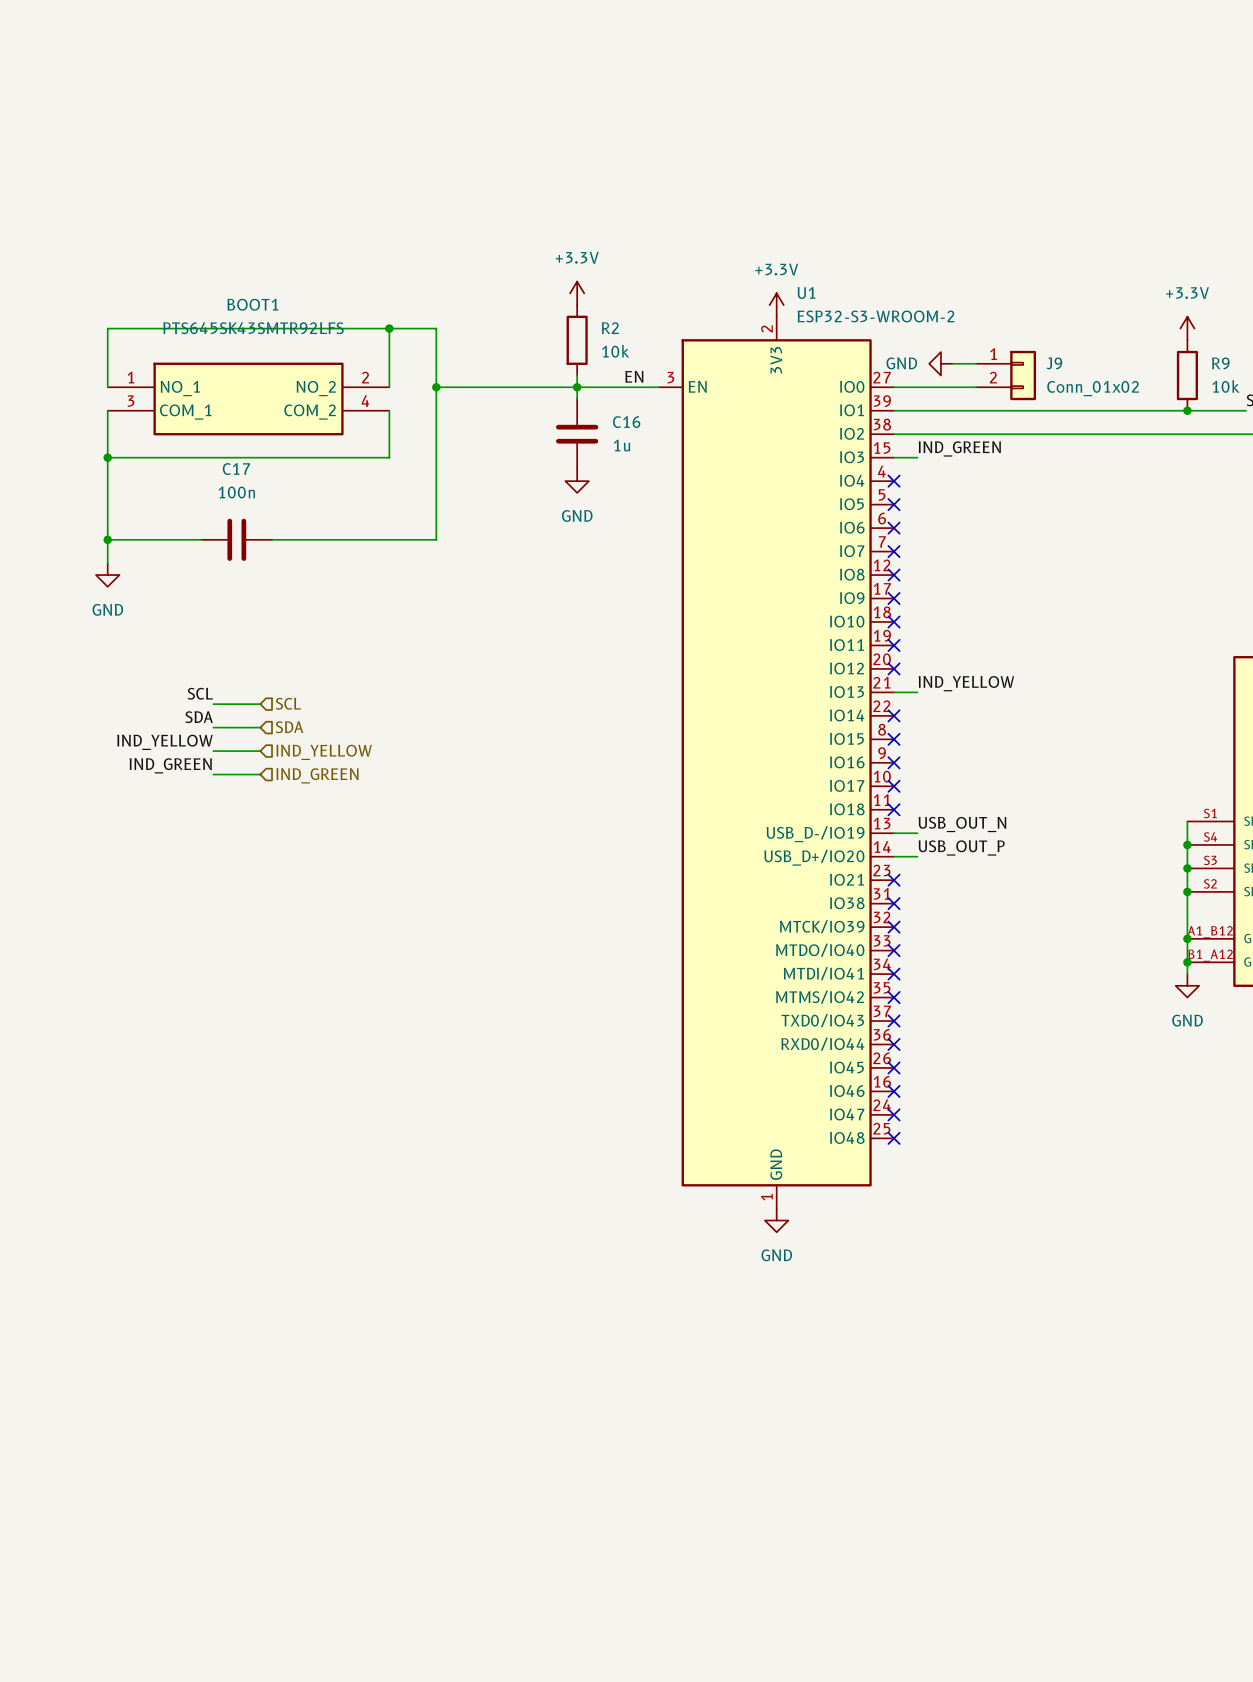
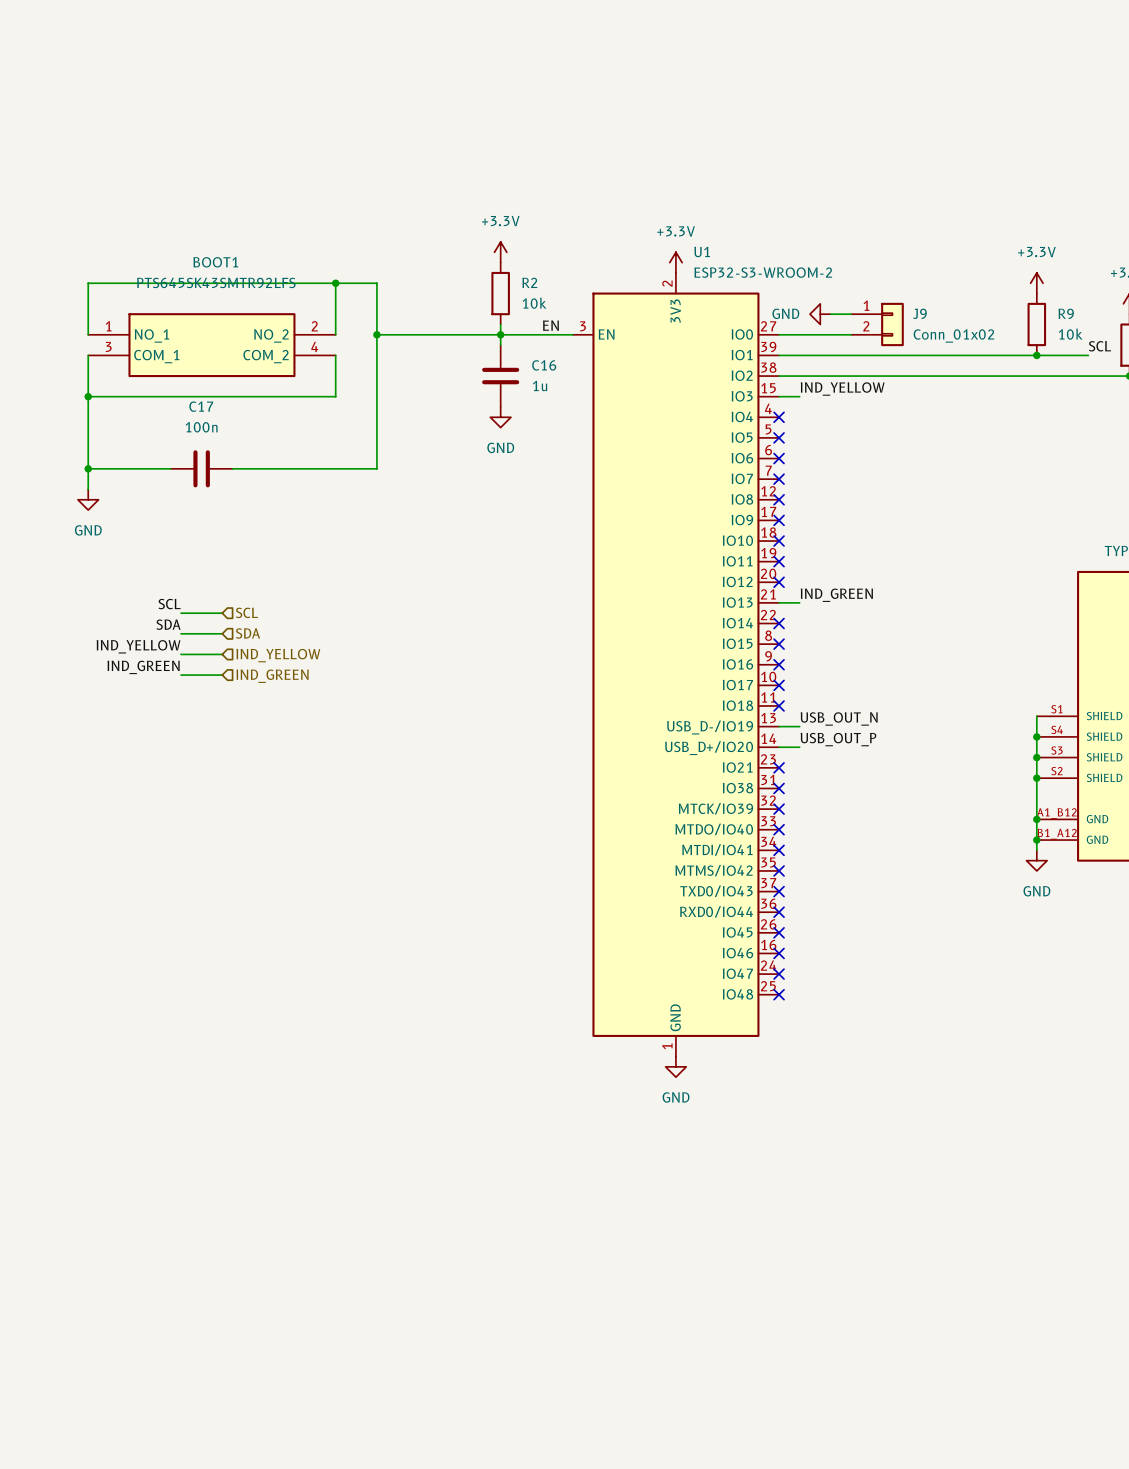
label: IND_GREEN (959, 448) -> IND_YELLOW (842, 389)
label: IND_YELLOW (966, 683) -> IND_GREEN (836, 595)

